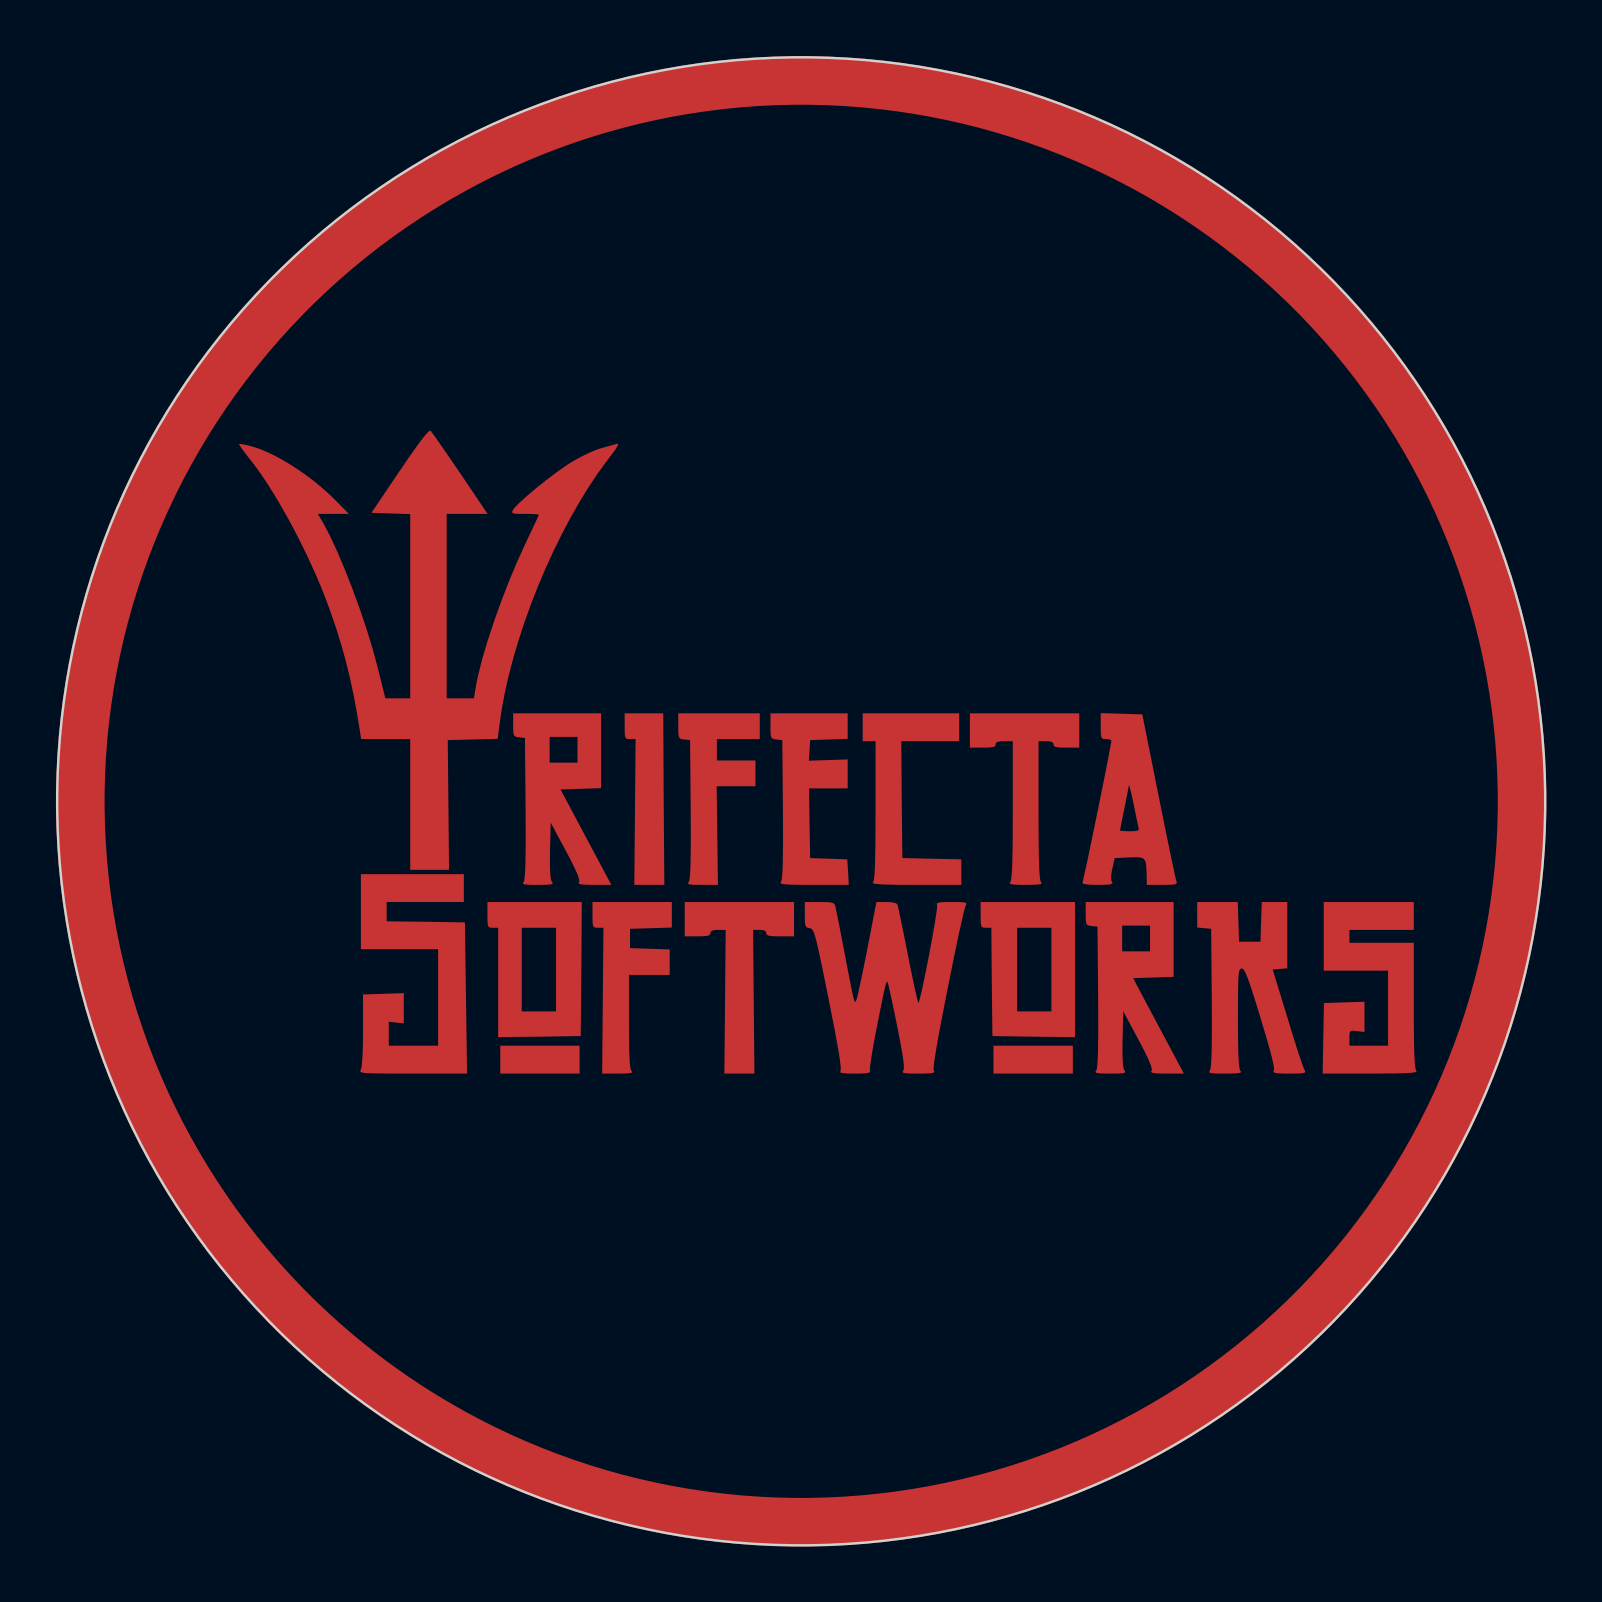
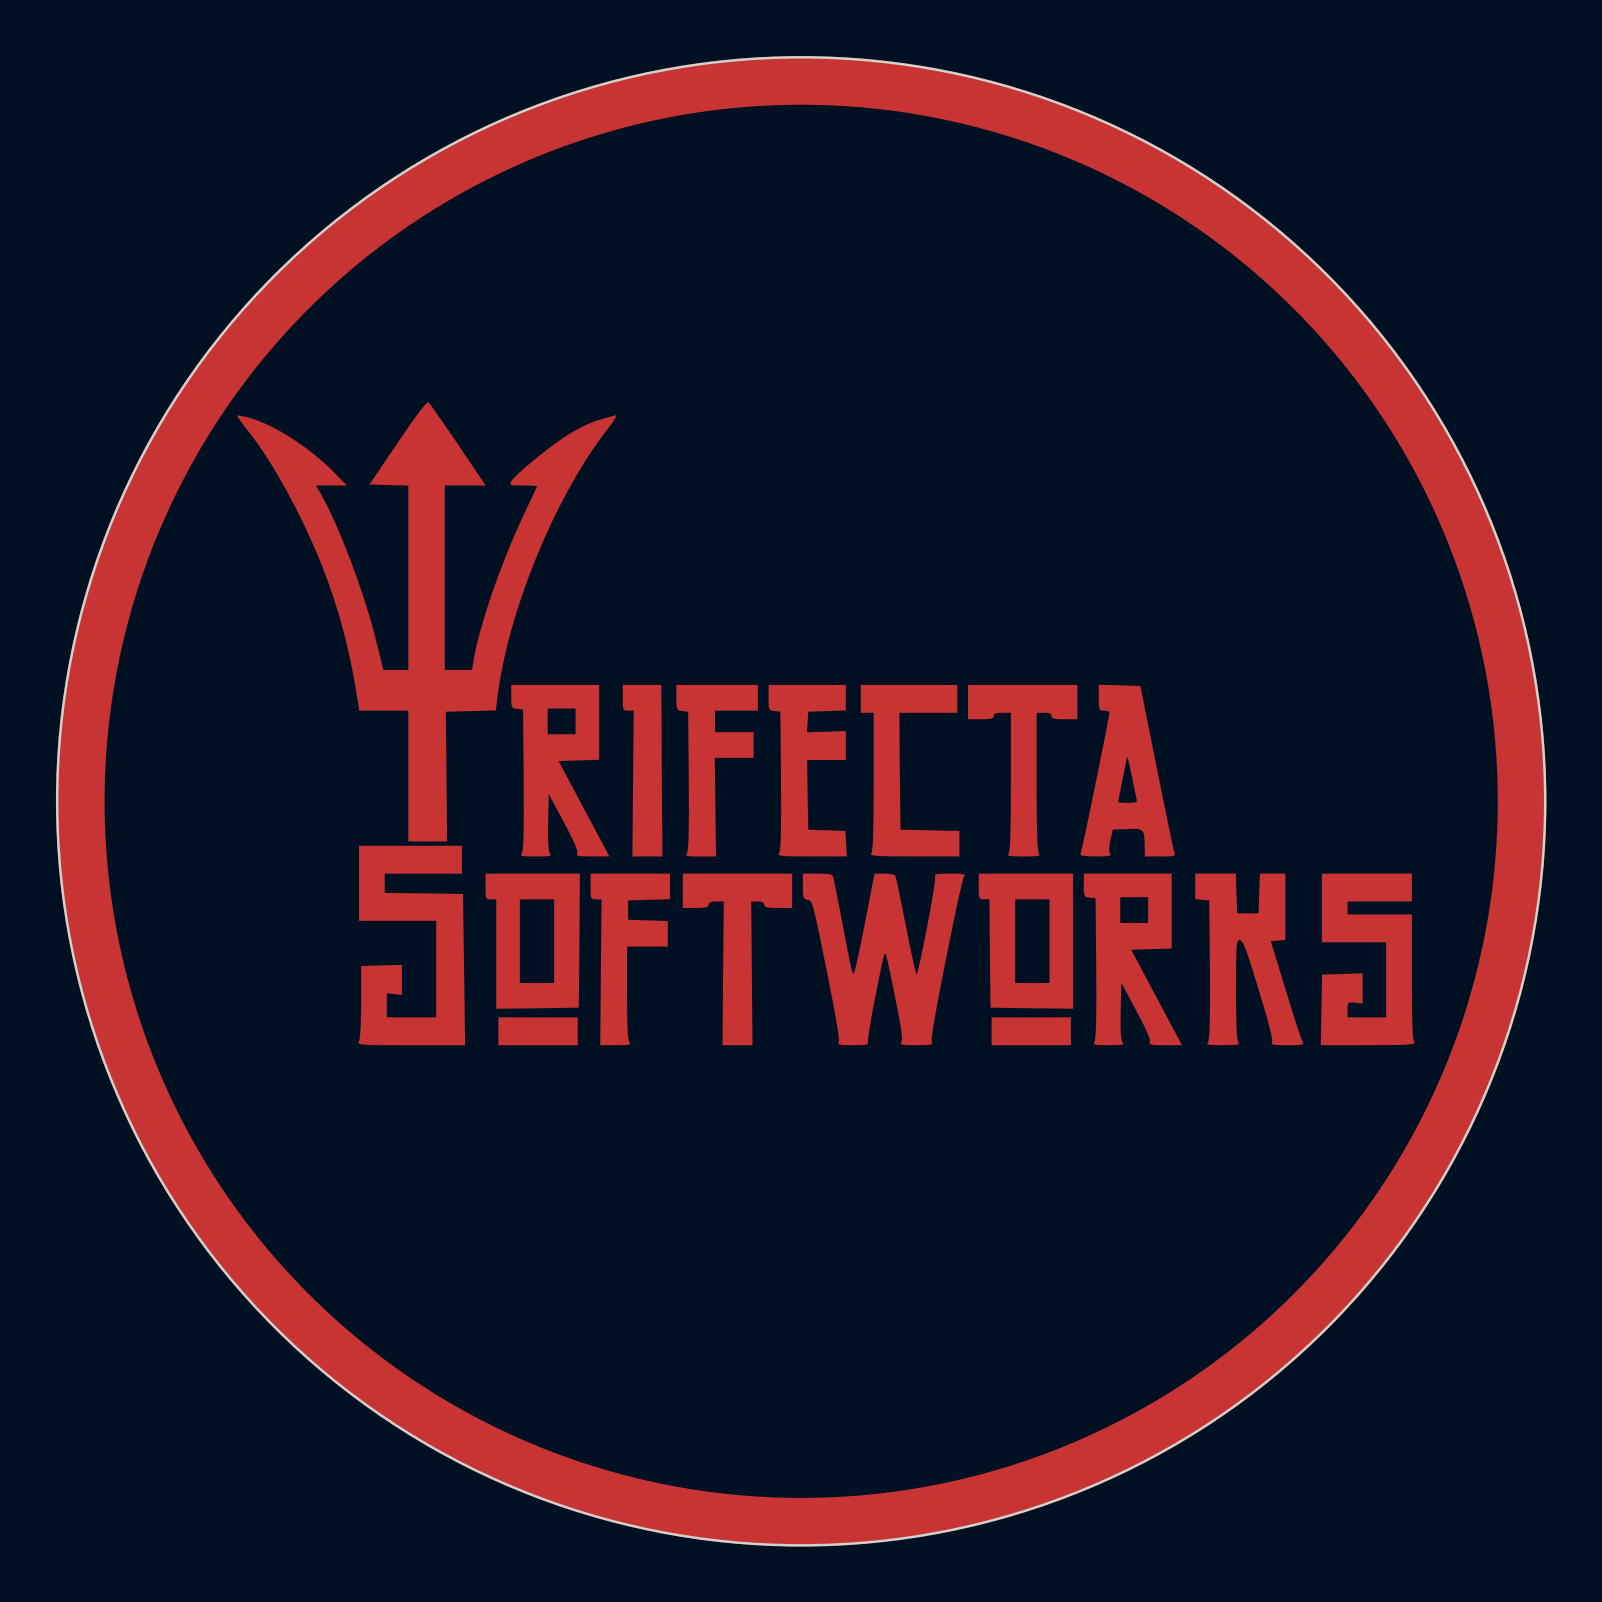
drawing position: (428, 650) -> (426, 621)
drawing position: (1129, 798) -> (1127, 770)
drawing position: (562, 799) -> (560, 770)
drawing position: (644, 799) -> (642, 770)
drawing position: (719, 799) -> (717, 770)
drawing position: (809, 799) -> (807, 770)
drawing position: (912, 799) -> (910, 770)
drawing position: (1024, 799) -> (1022, 770)
drawing position: (534, 969) -> (532, 941)
drawing position: (1027, 969) -> (1025, 941)
drawing position: (413, 973) -> (411, 945)
drawing position: (632, 987) -> (630, 959)
drawing position: (739, 987) -> (737, 959)
drawing position: (885, 987) -> (883, 959)
drawing position: (1134, 987) -> (1132, 959)
drawing position: (1251, 987) -> (1249, 959)
drawing position: (1369, 987) -> (1367, 959)
drawing position: (539, 1059) -> (538, 1031)
drawing position: (1033, 1059) -> (1031, 1031)

